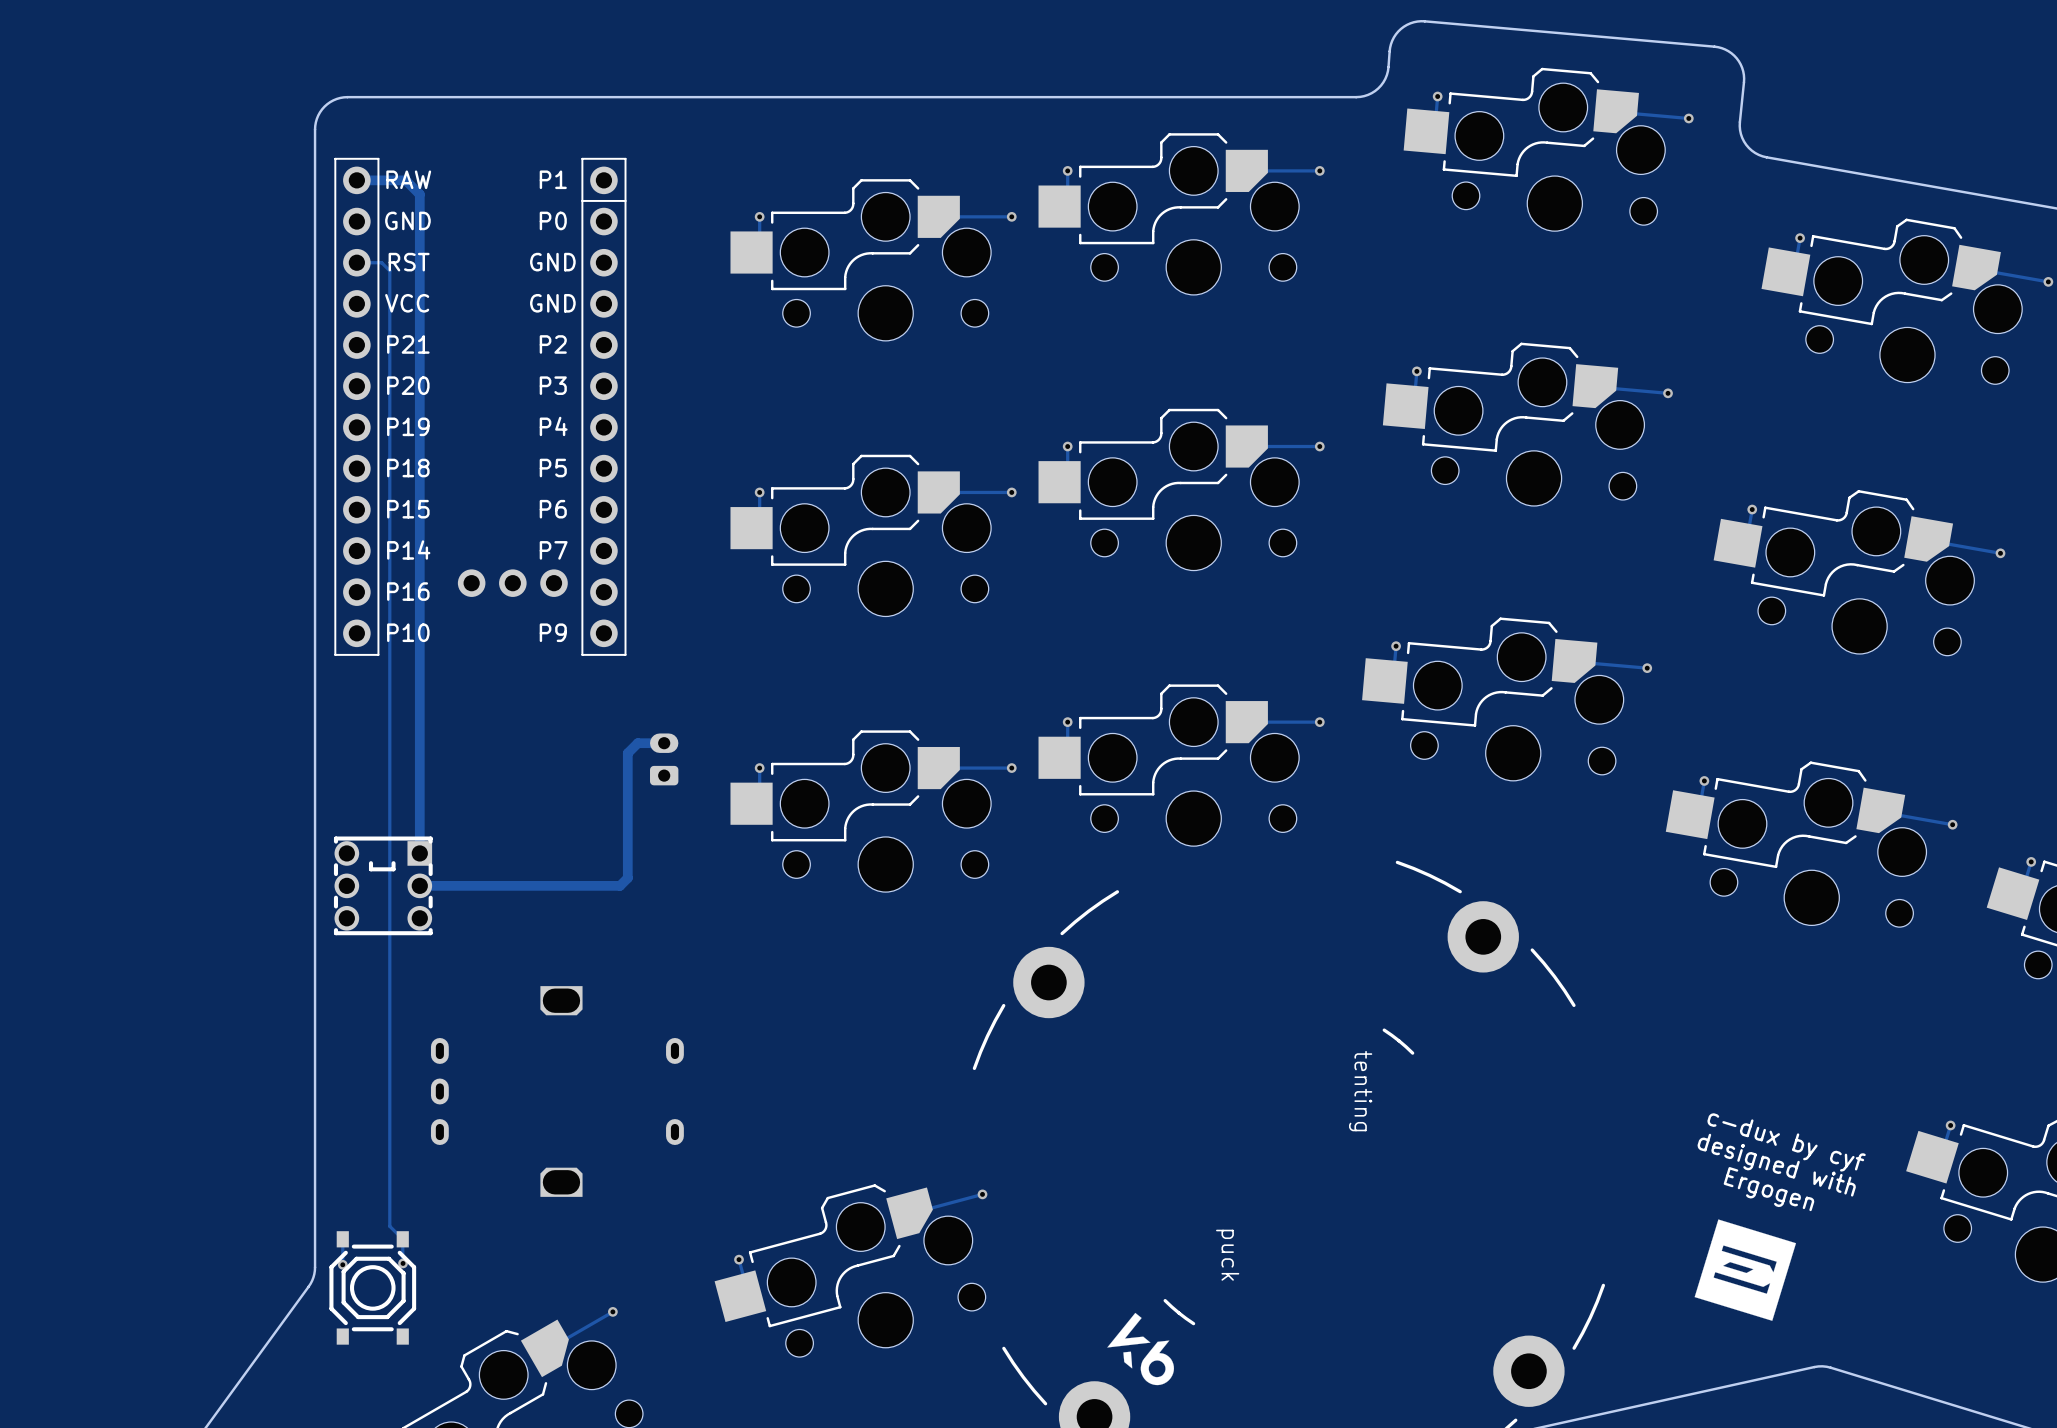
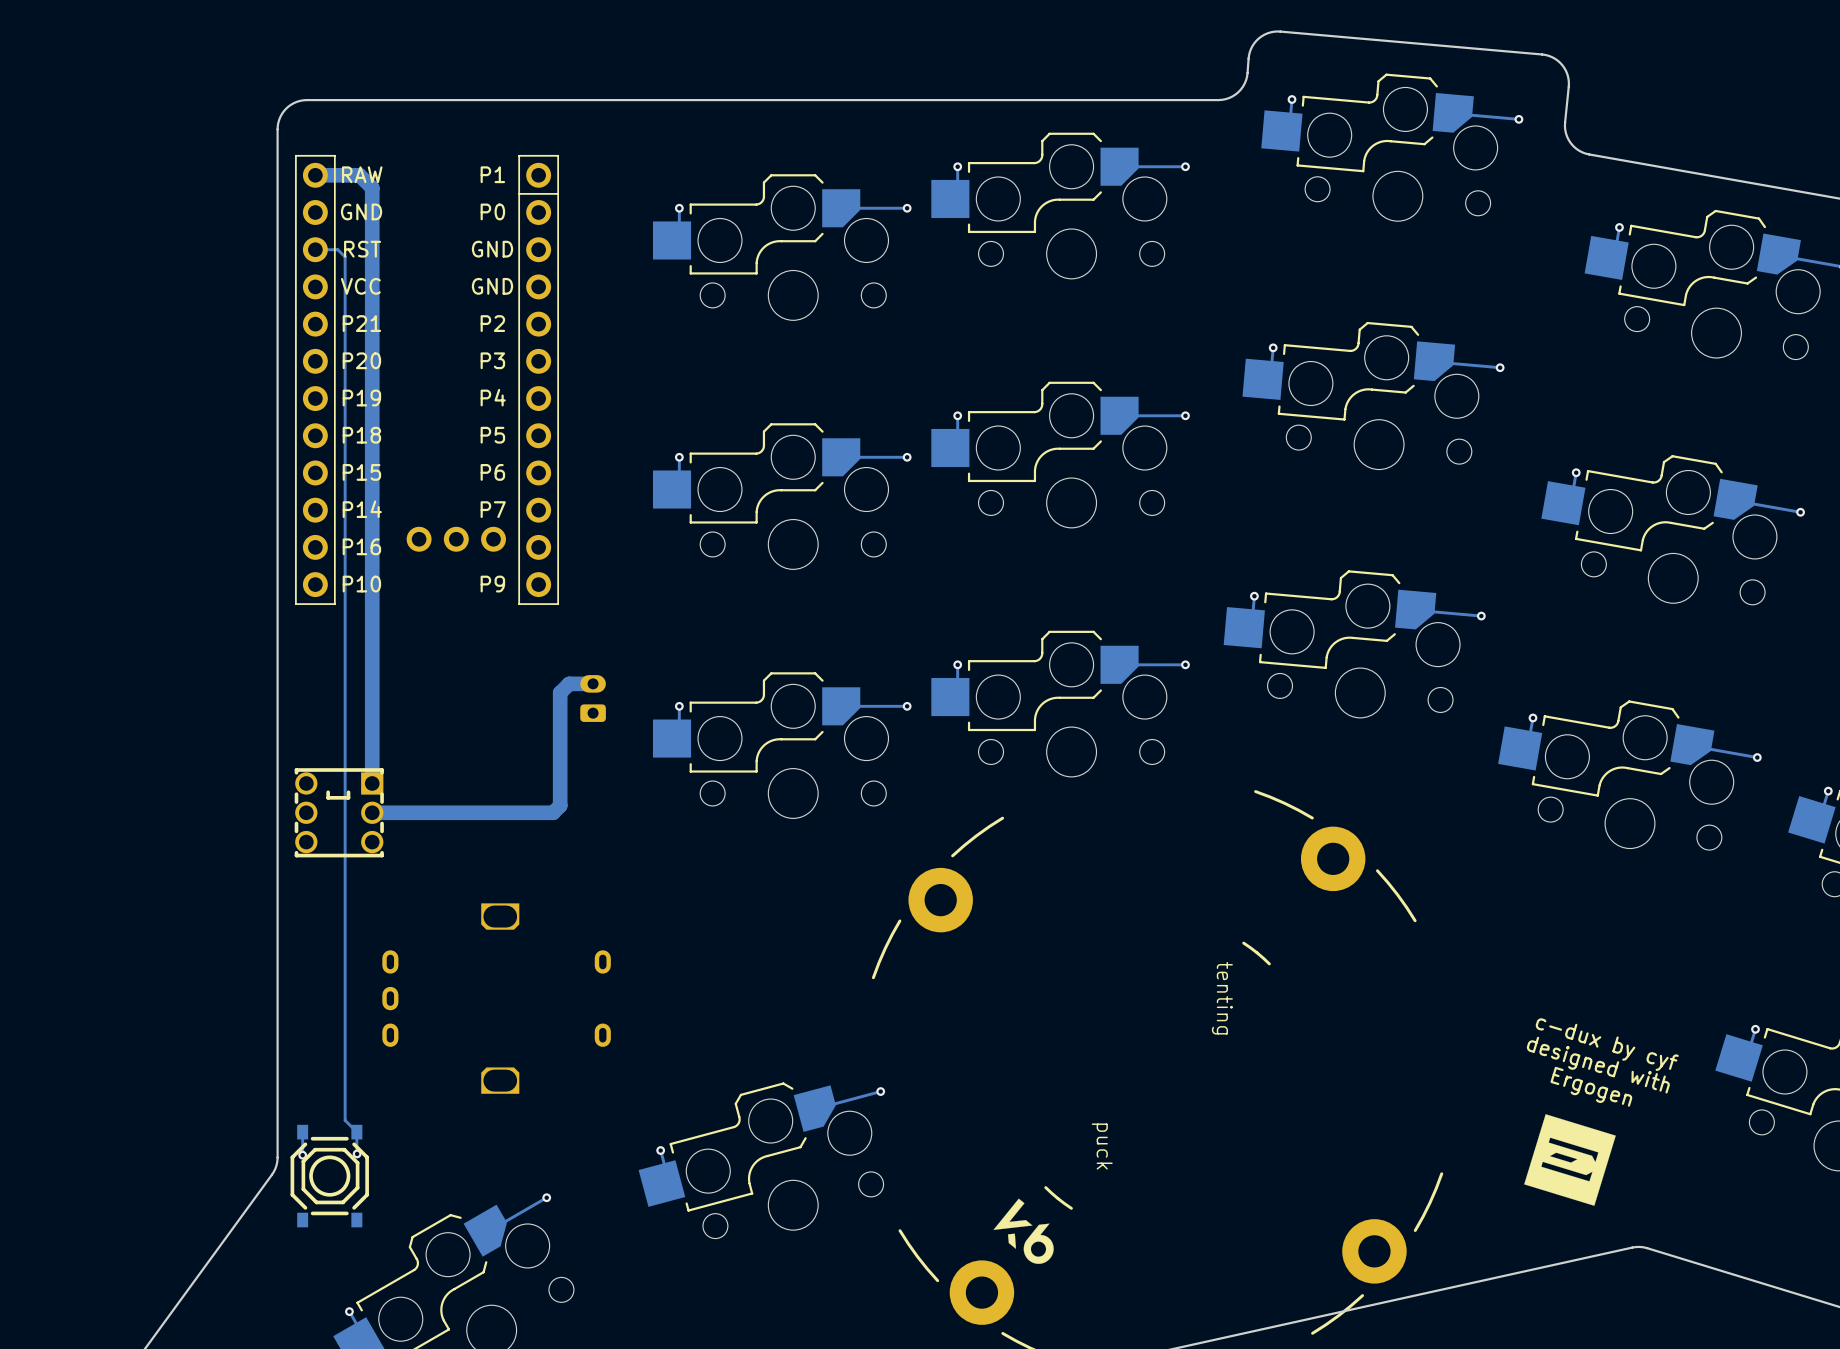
track width: thin (356, 180) (405, 180) (419, 194) (419, 853) -> thick (315, 175) (359, 175) (372, 187) (372, 783)
track width: thin (664, 743) (637, 743) (627, 753) (627, 878) (620, 885) (419, 885) -> thick (593, 683) (569, 683) (560, 692) (560, 805) (553, 812) (372, 812)

